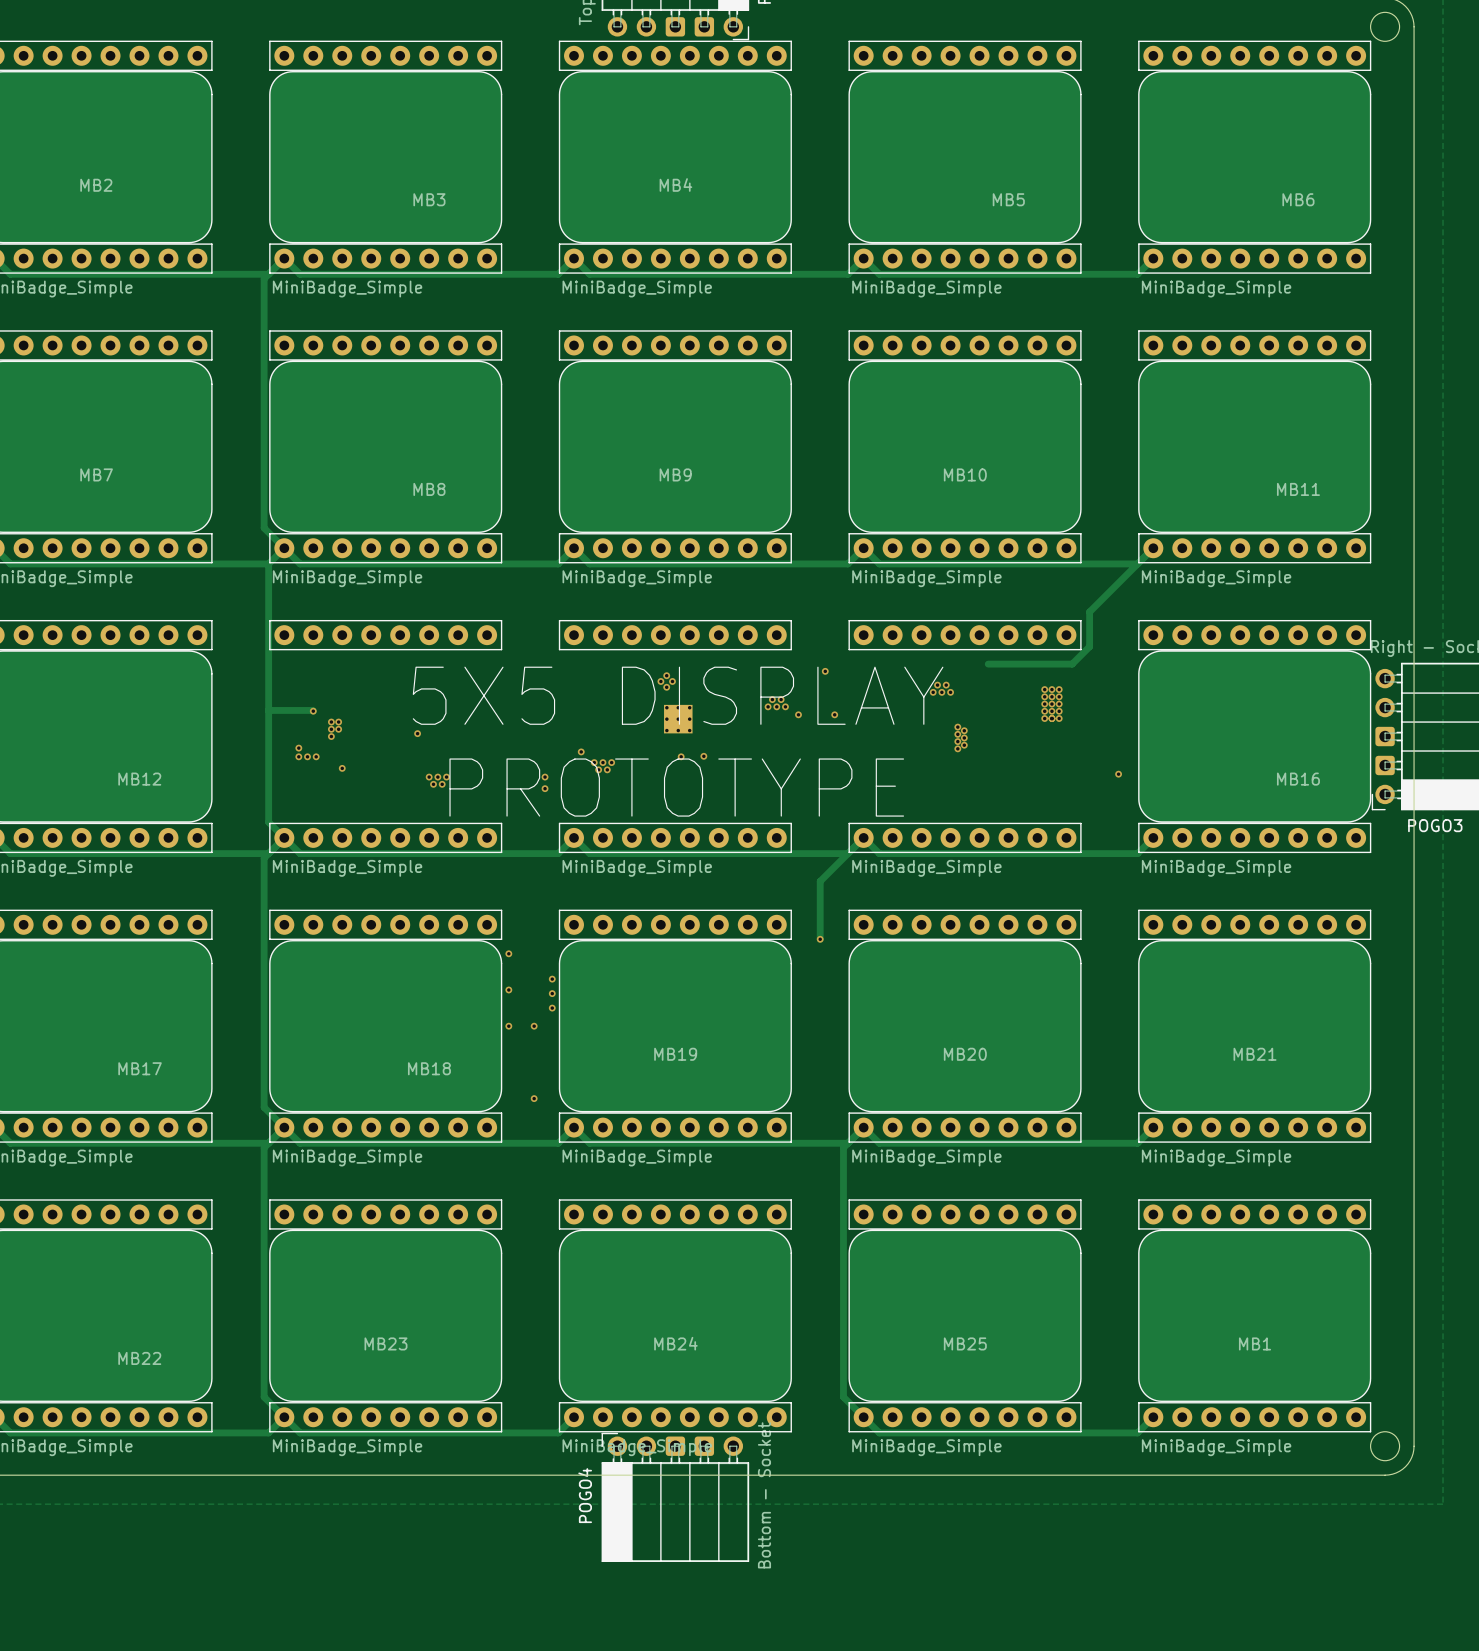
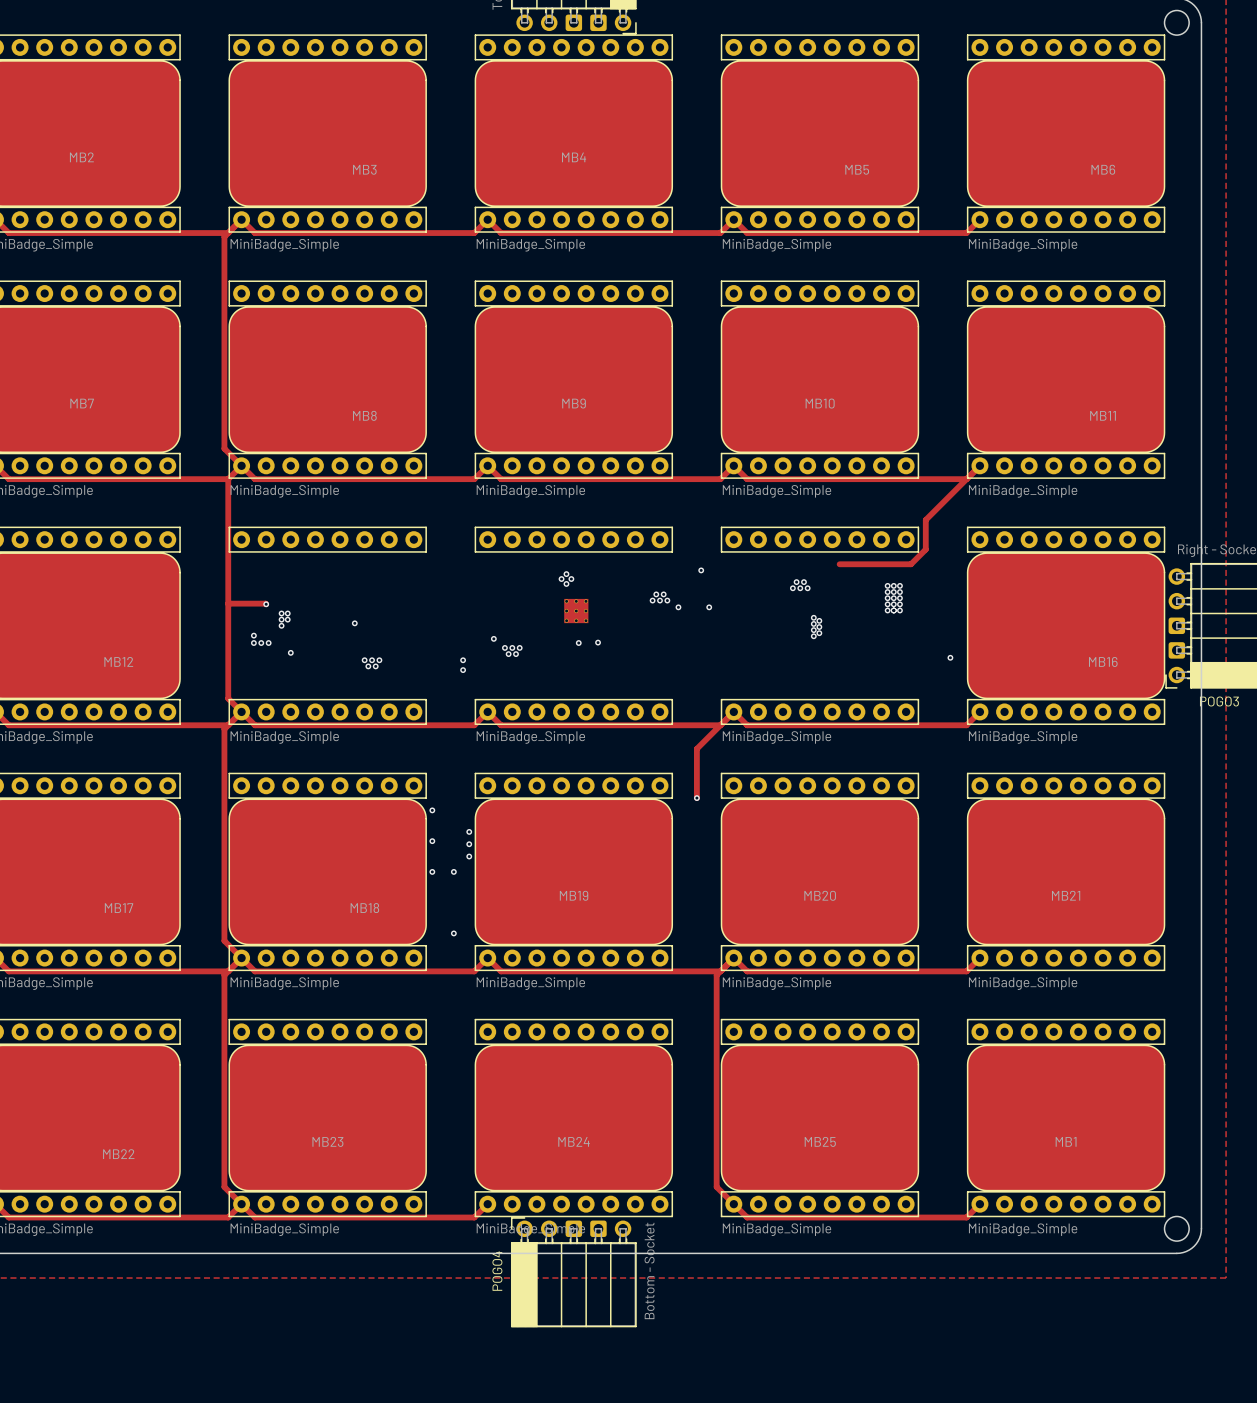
text: 5X5 DISPLAY (678, 695) -> none
text: PROTOTYPE (676, 787) -> none

